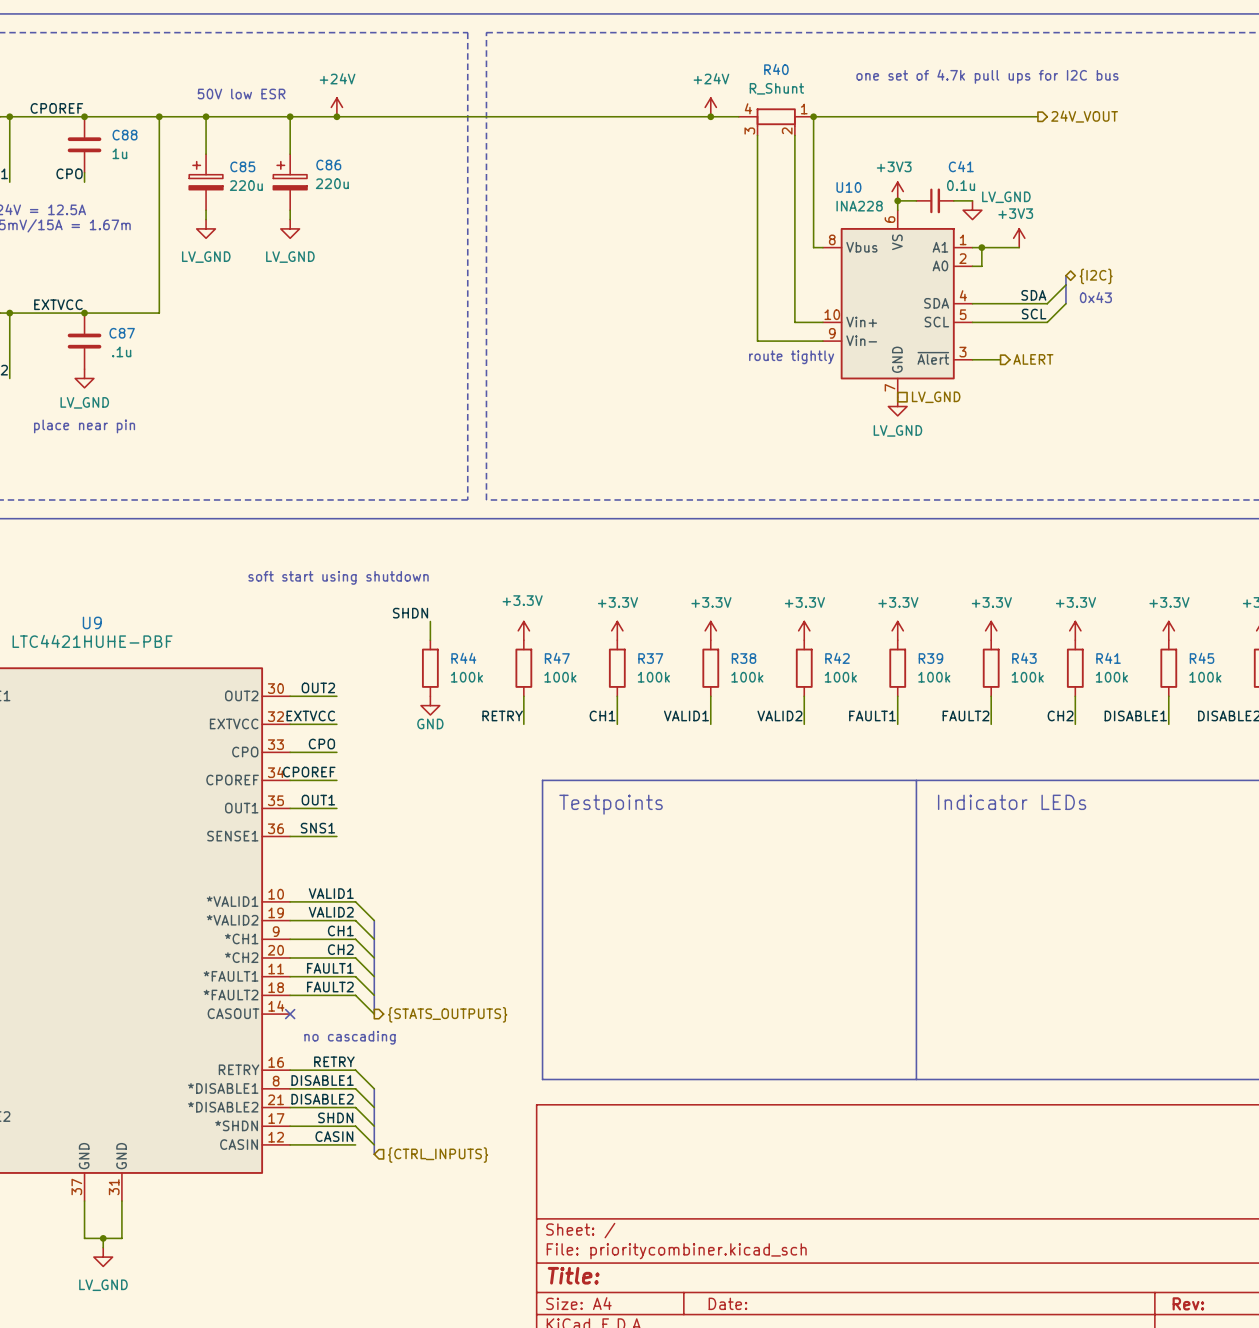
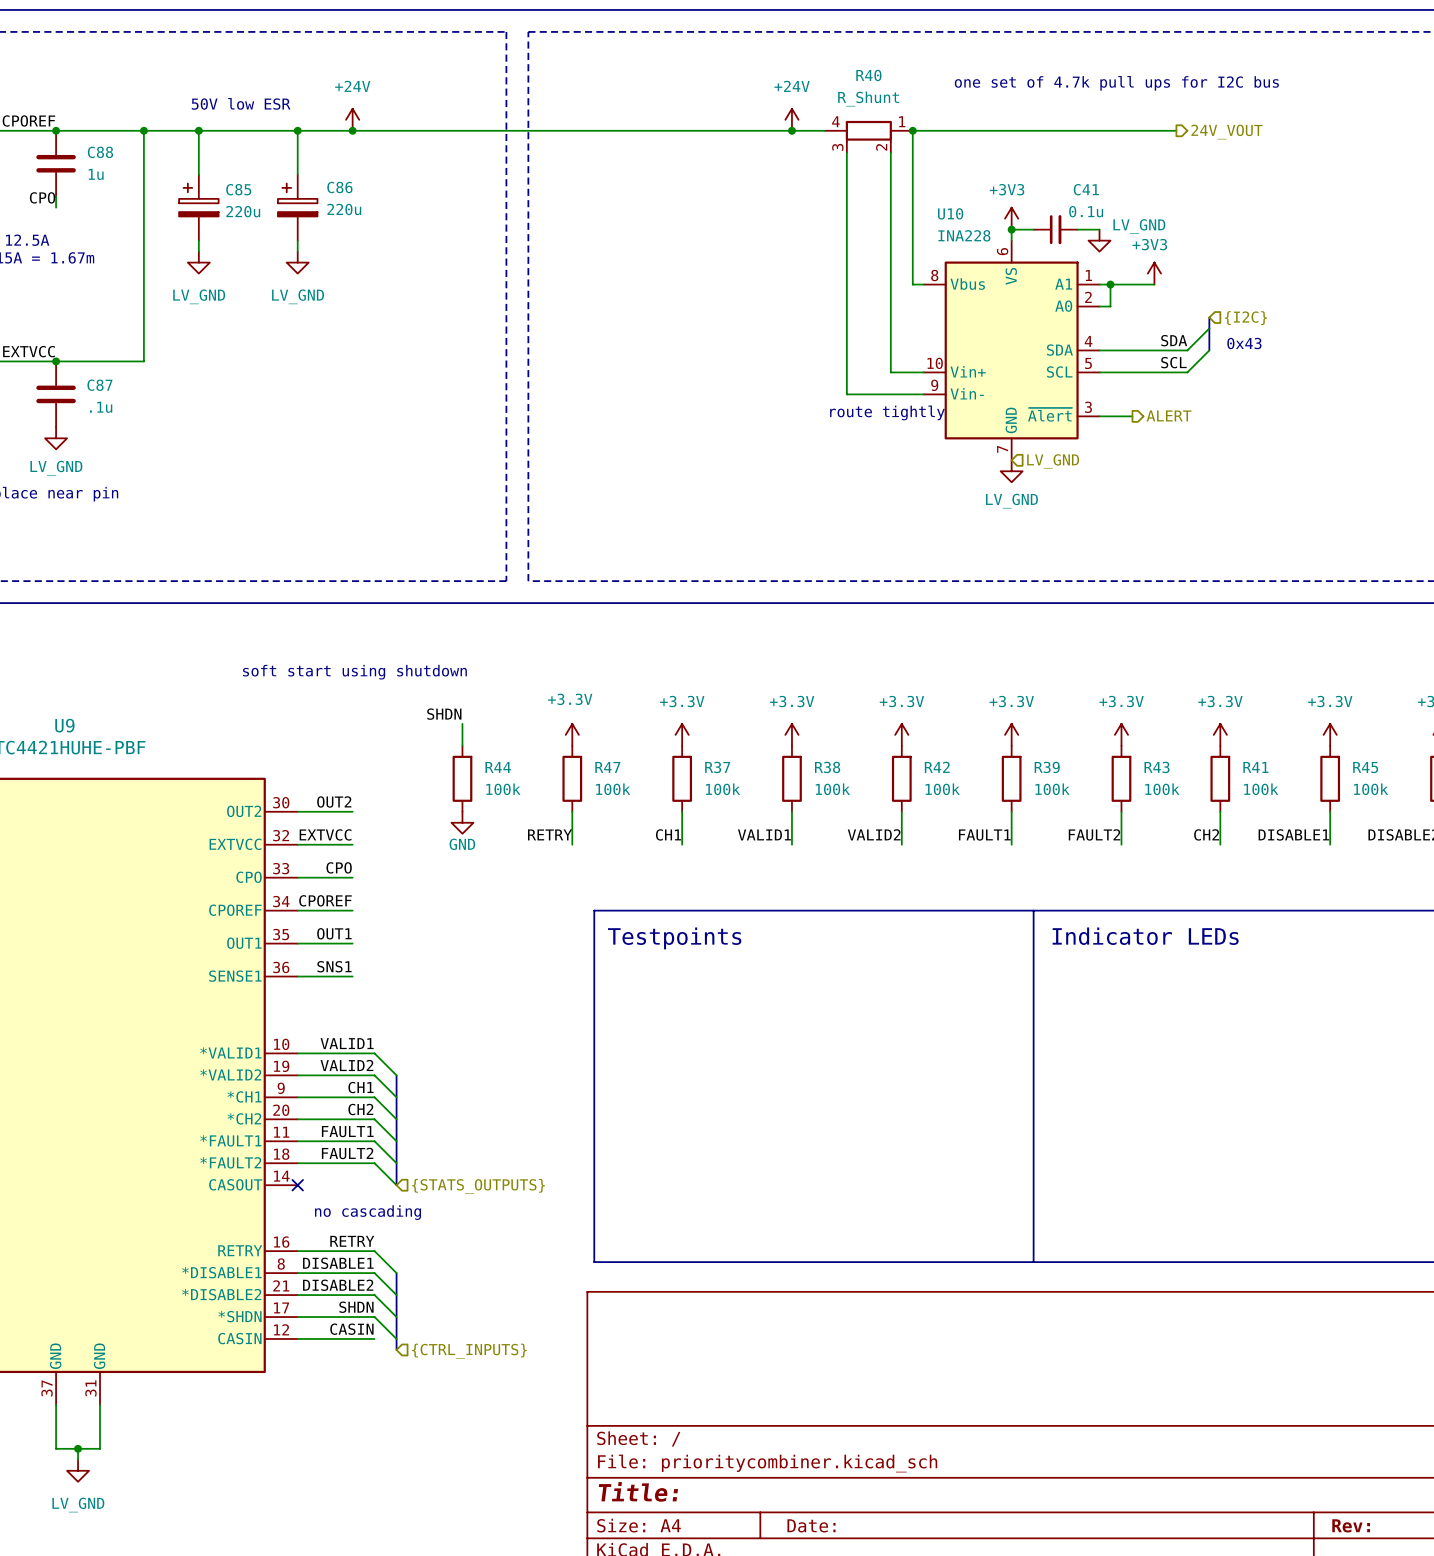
hierarchical label shape: bidirectional (1096, 276) -> input (1245, 318)
hierarchical label shape: passive (936, 397) -> input (1053, 461)
hierarchical label shape: output (447, 1014) -> input (478, 1186)

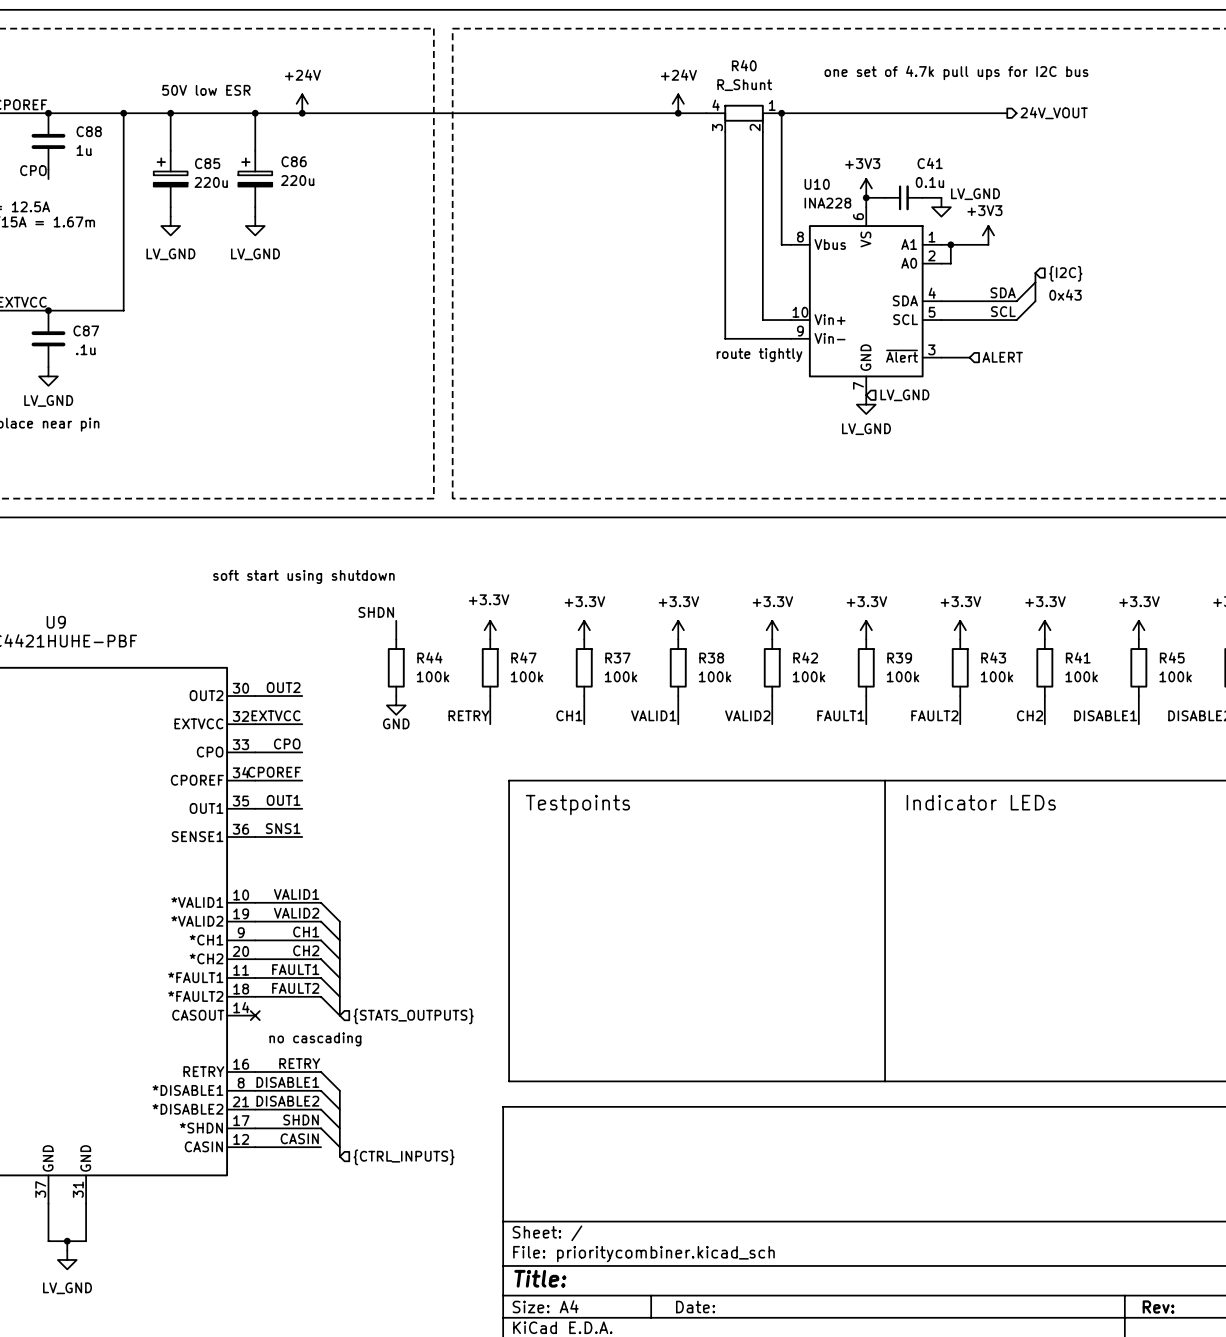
hierarchical label shape: output (1169, 415) -> input (1002, 357)

